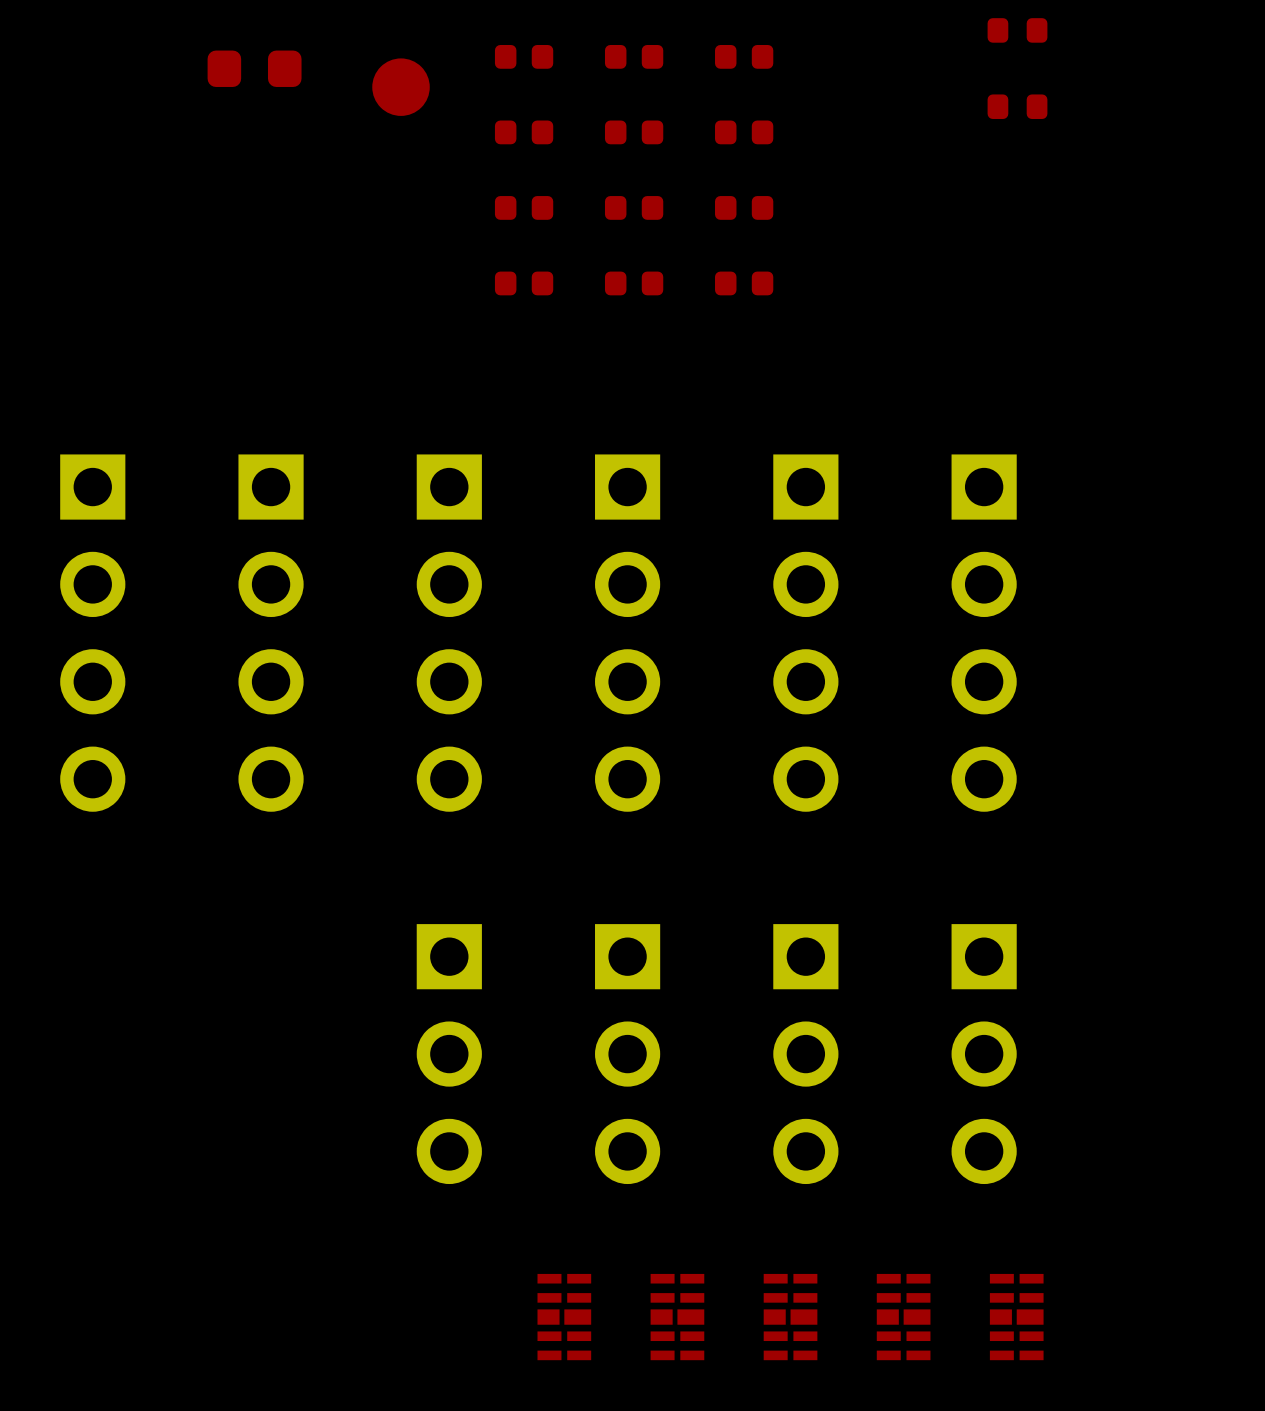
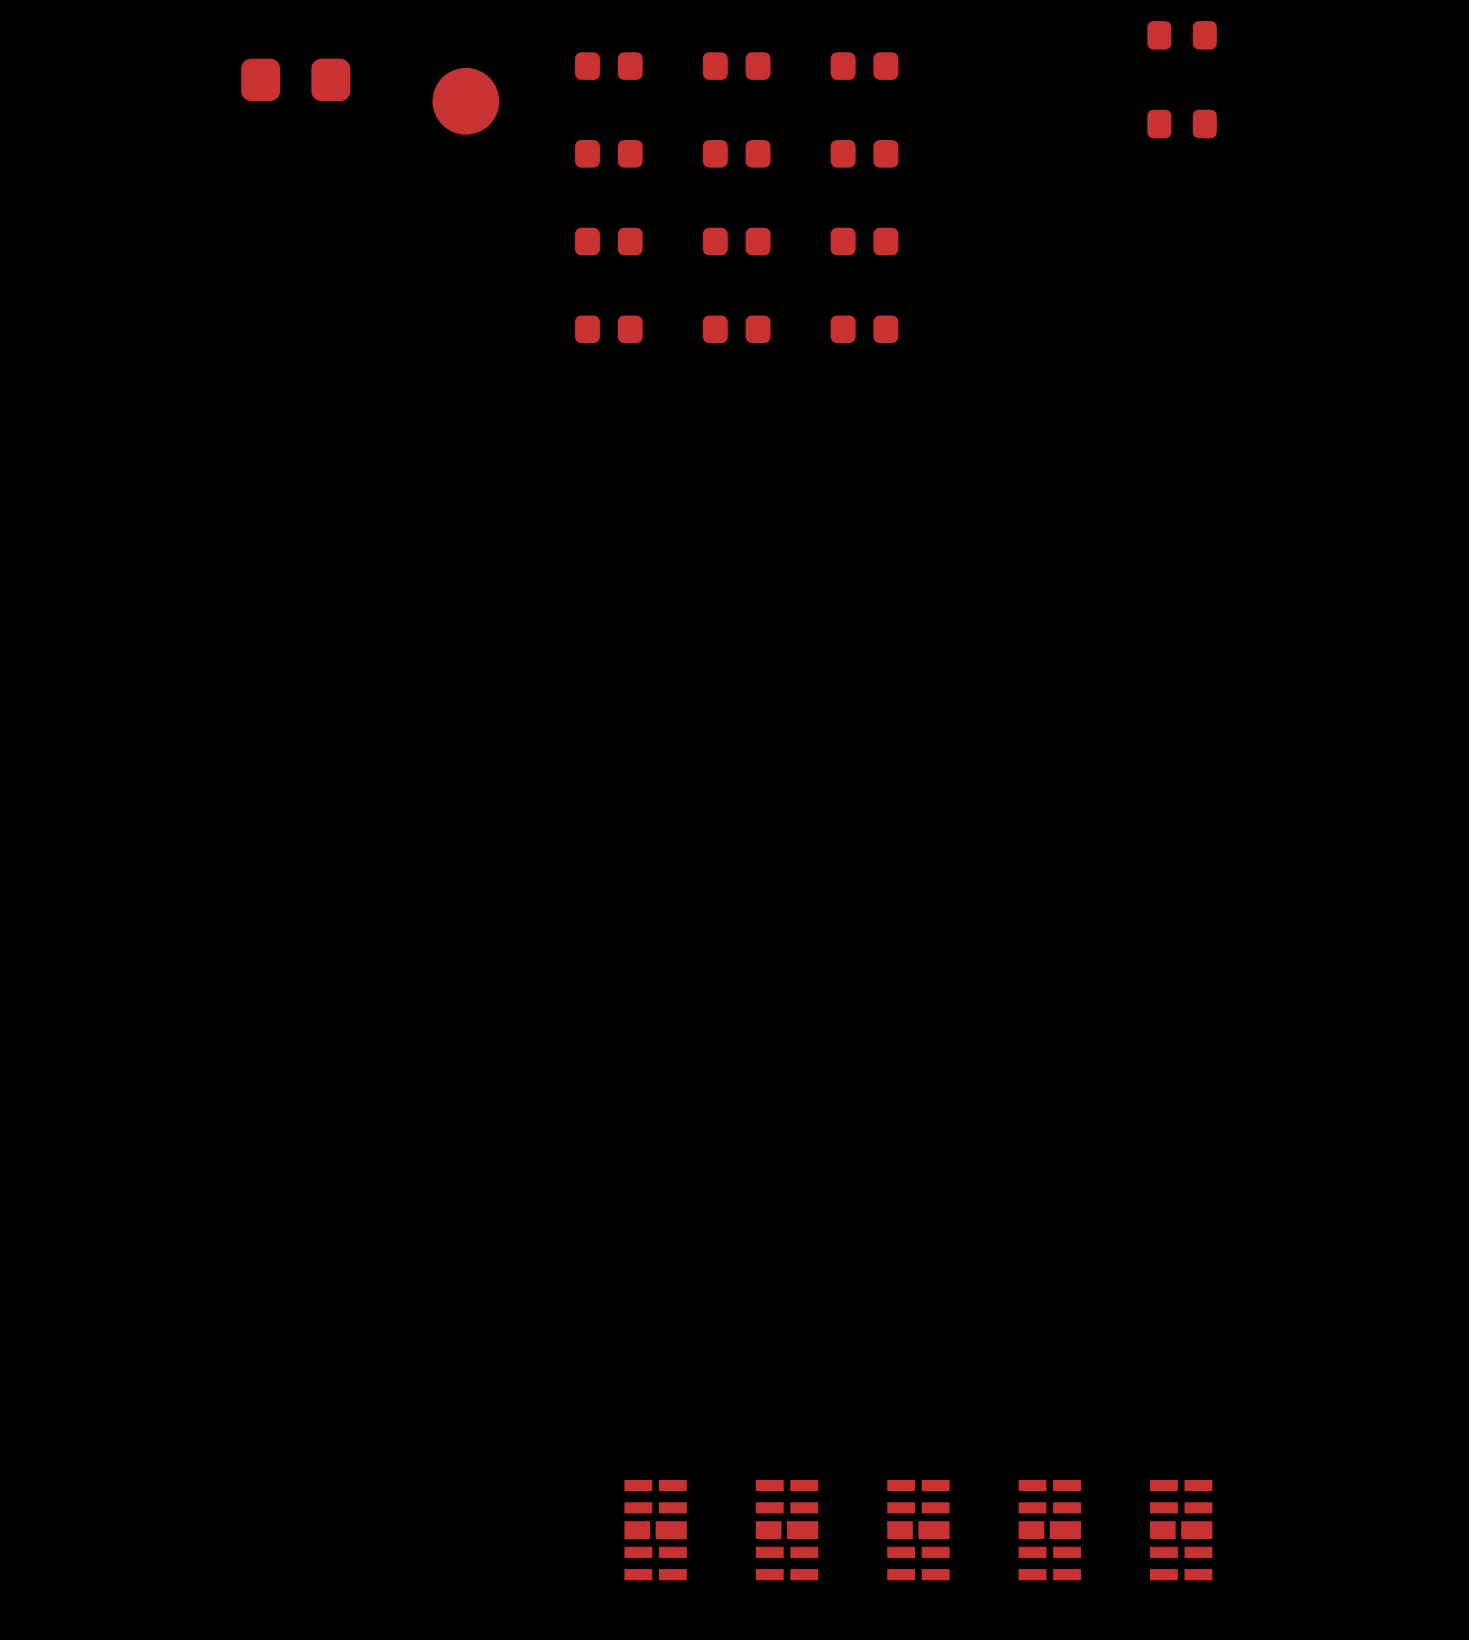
part: (92, 633) -> none
part: (271, 633) -> none
part: (449, 633) -> none
part: (627, 633) -> none
part: (805, 633) -> none
part: (984, 633) -> none
part: (449, 1054) -> none
part: (627, 1054) -> none
part: (805, 1054) -> none
part: (984, 1054) -> none

